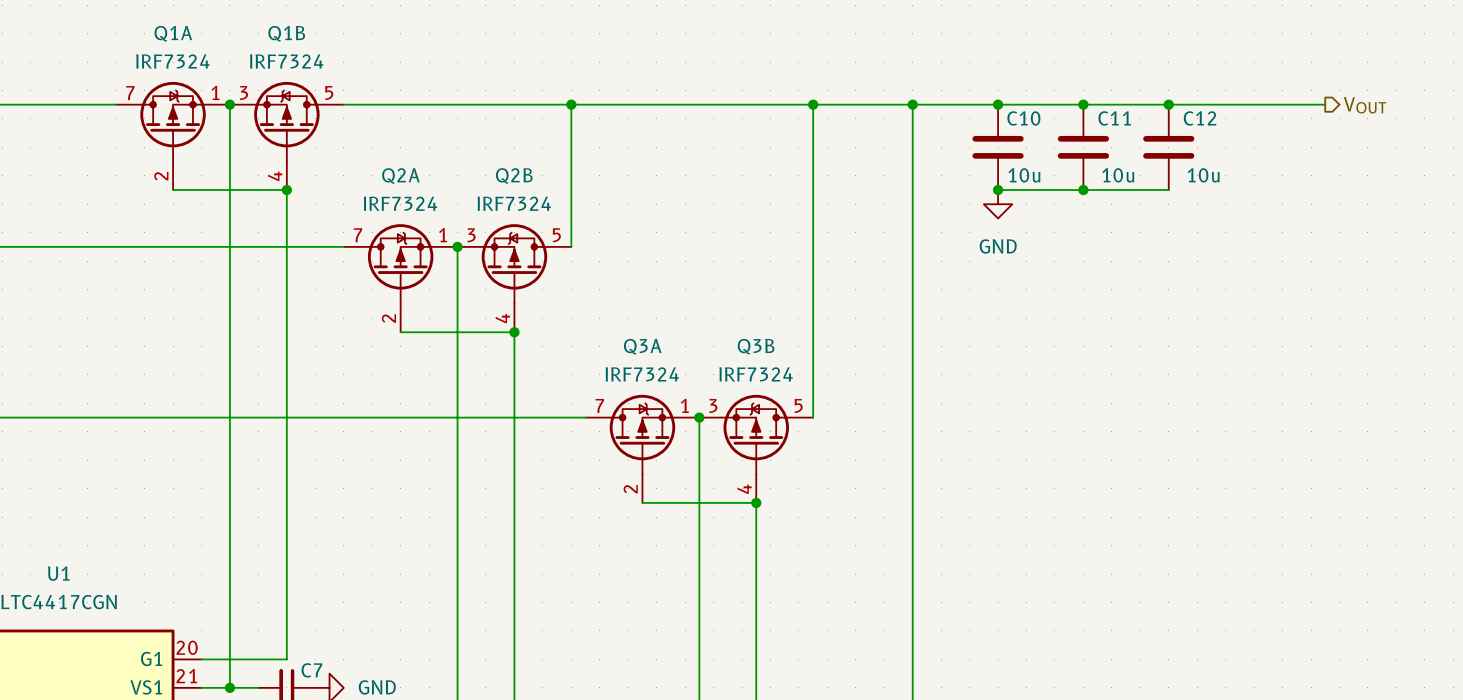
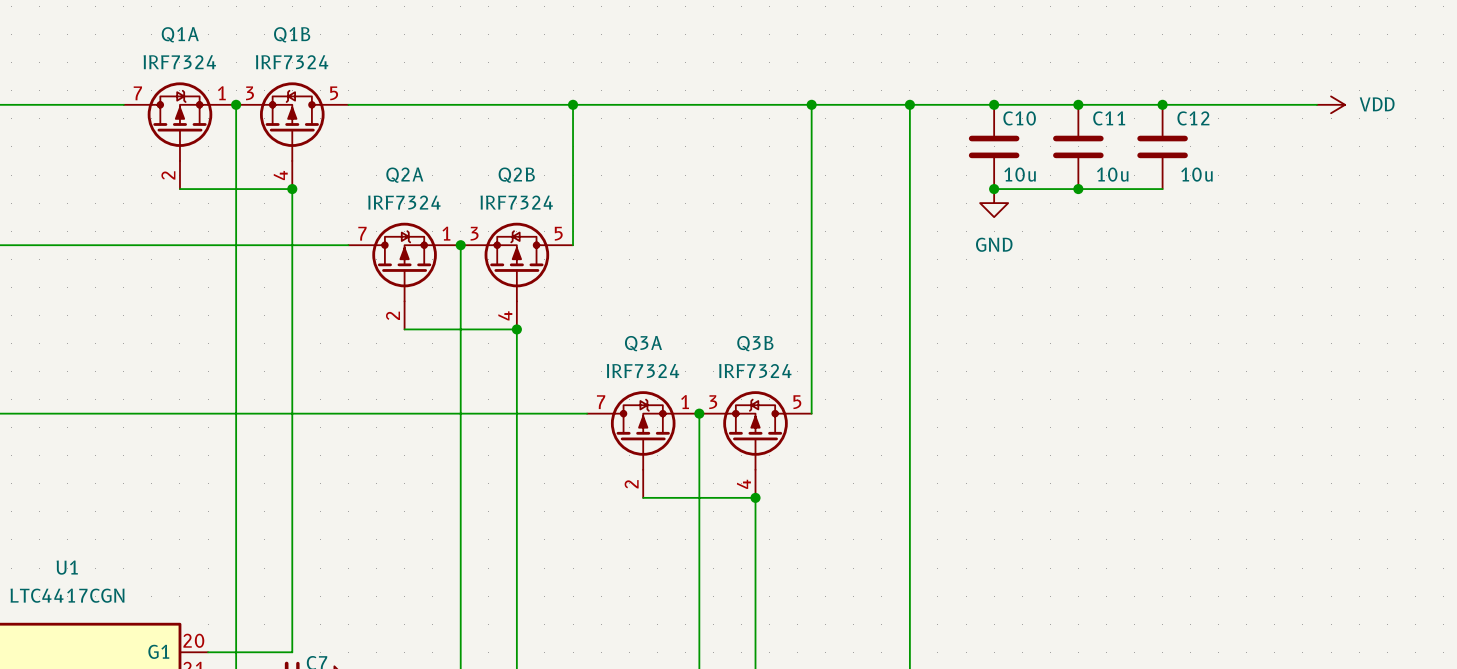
power symbol: none -> VDD (1331, 104)
hierarchical label: VOUT (1365, 105) -> none

